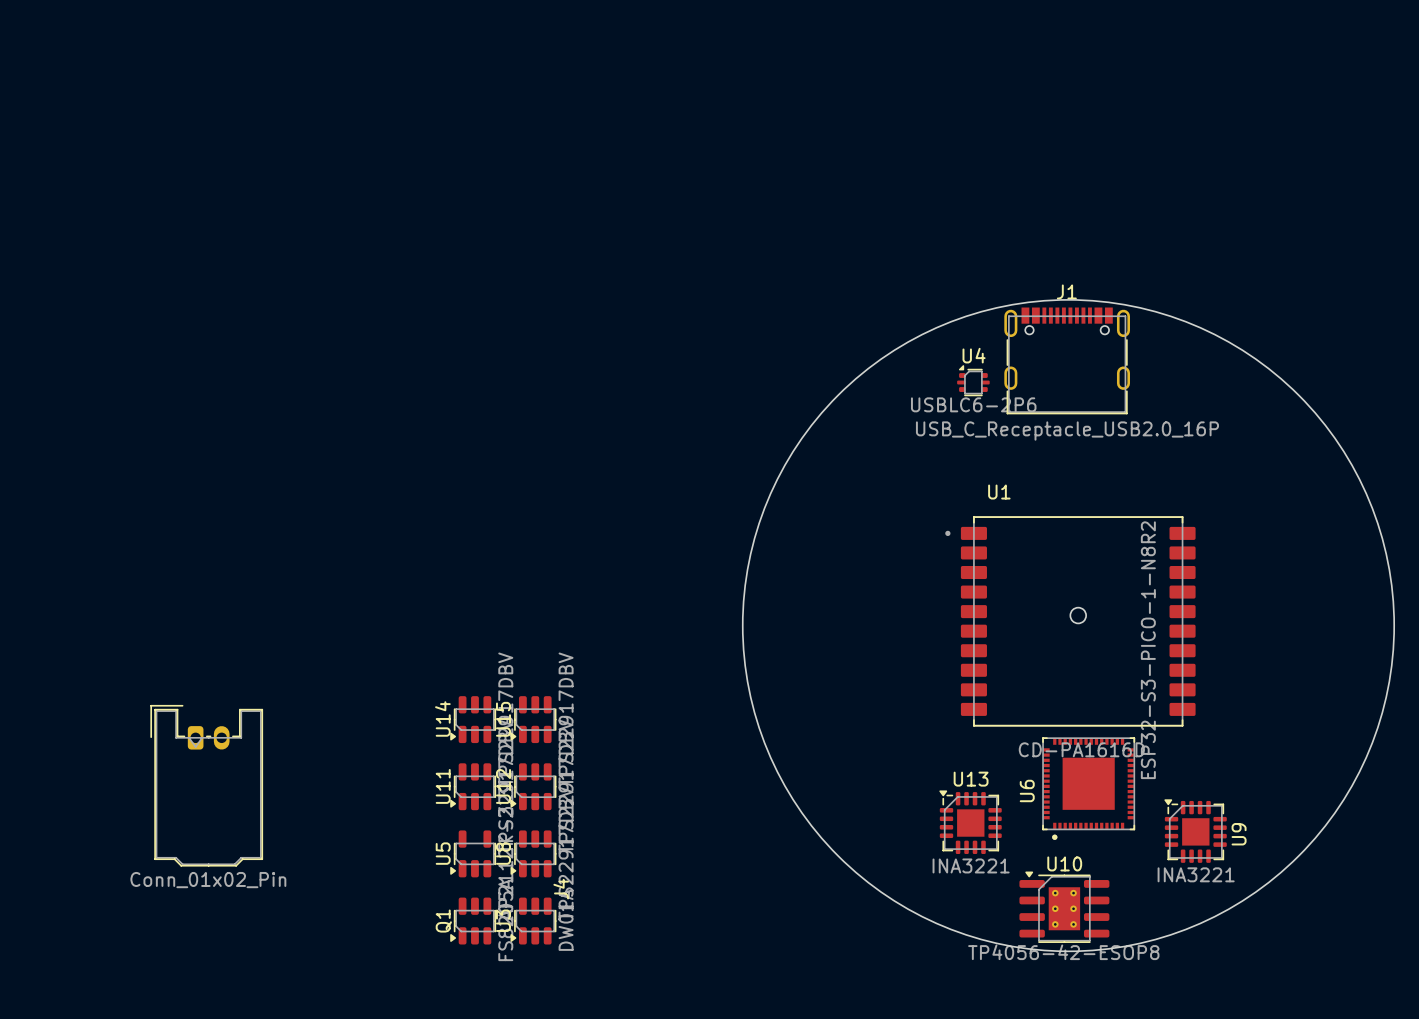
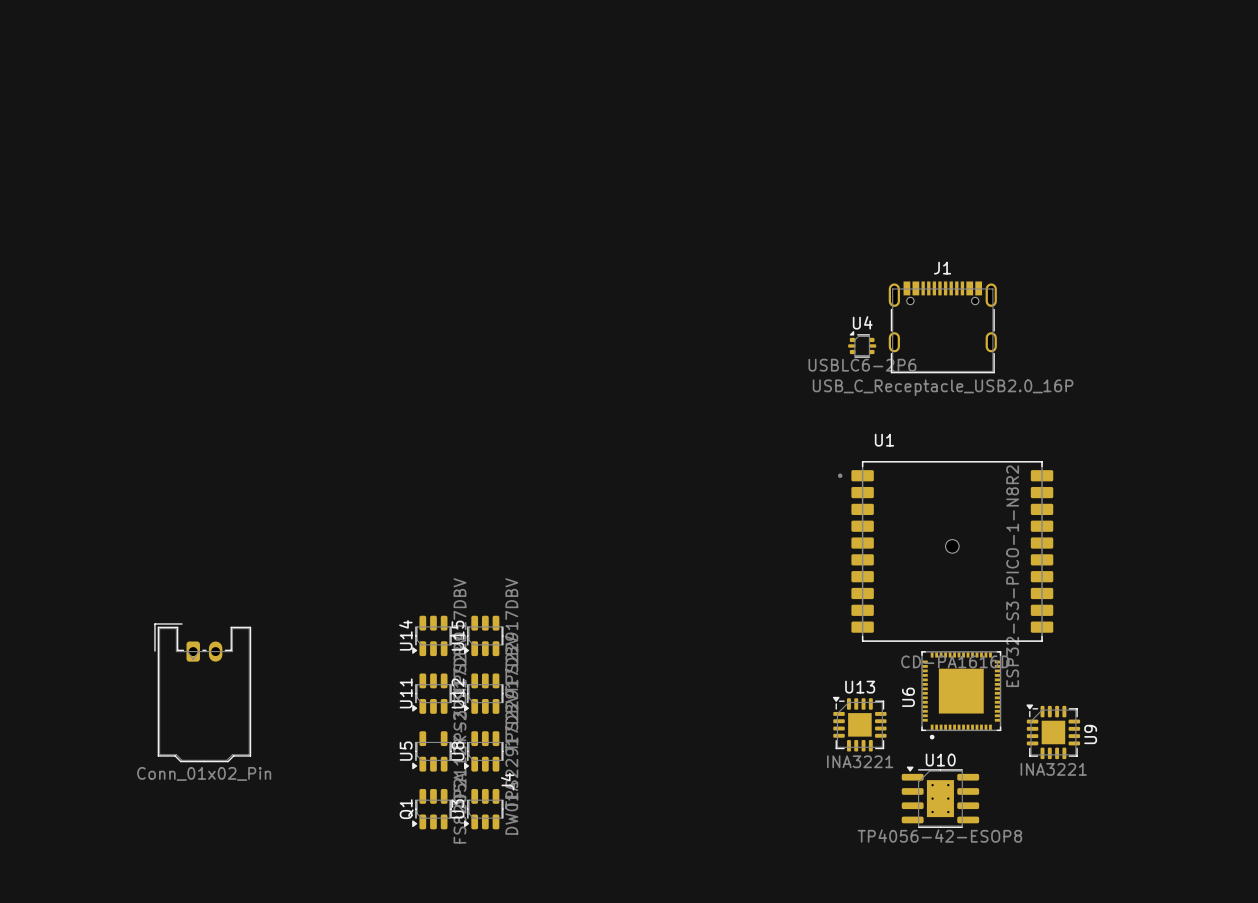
round board edge: [742, 299, 1395, 952] -> none

